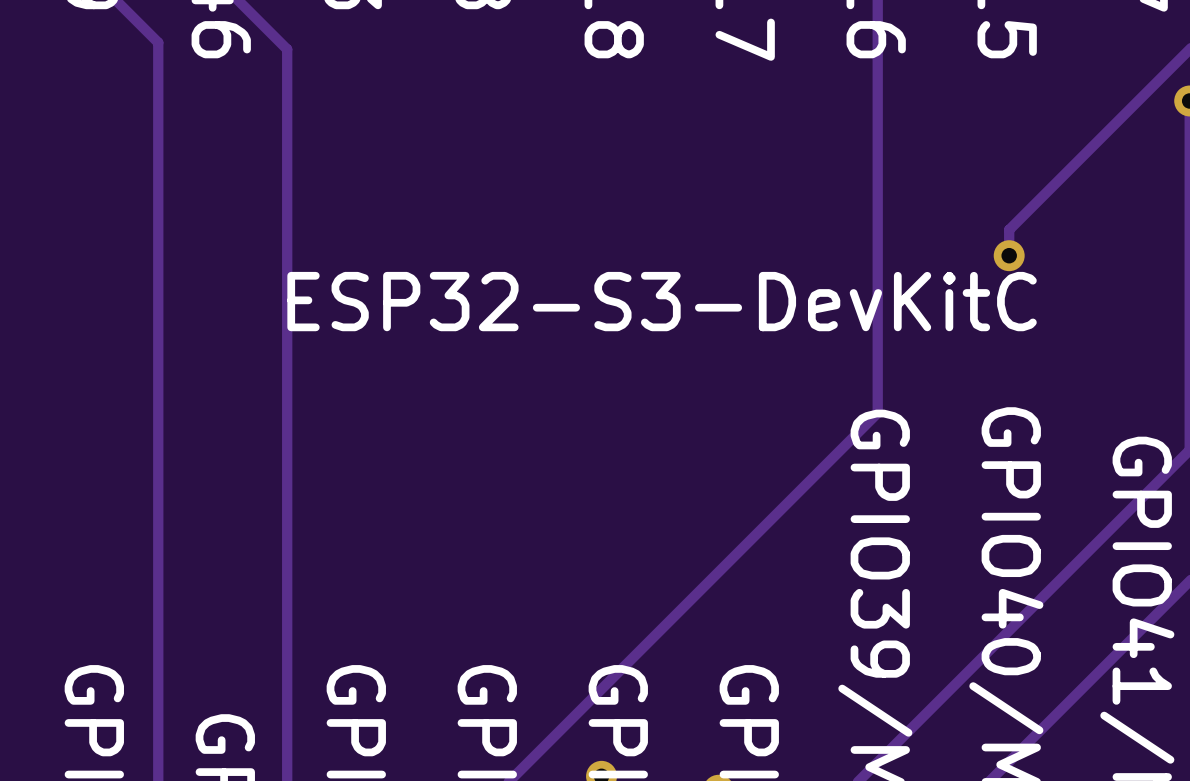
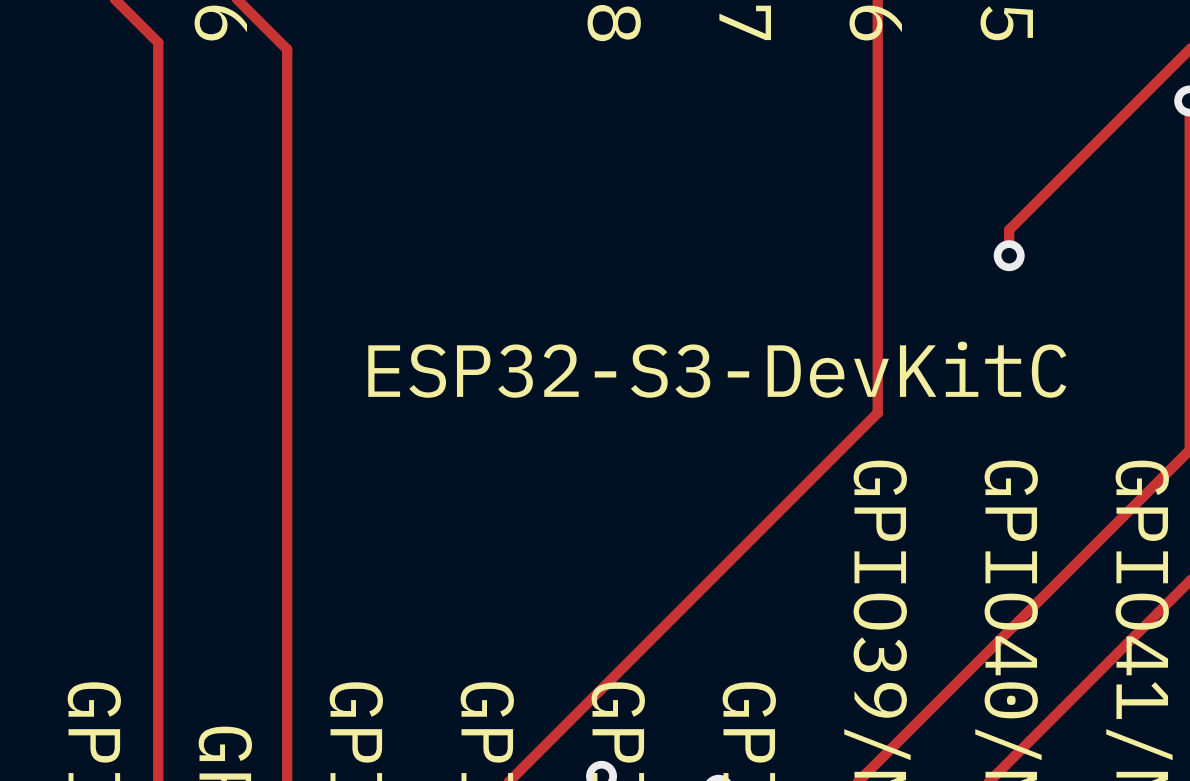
part value position: ESP32-S3-DevKitC (662, 301) -> ESP32-S3-DevKitC (717, 369)

